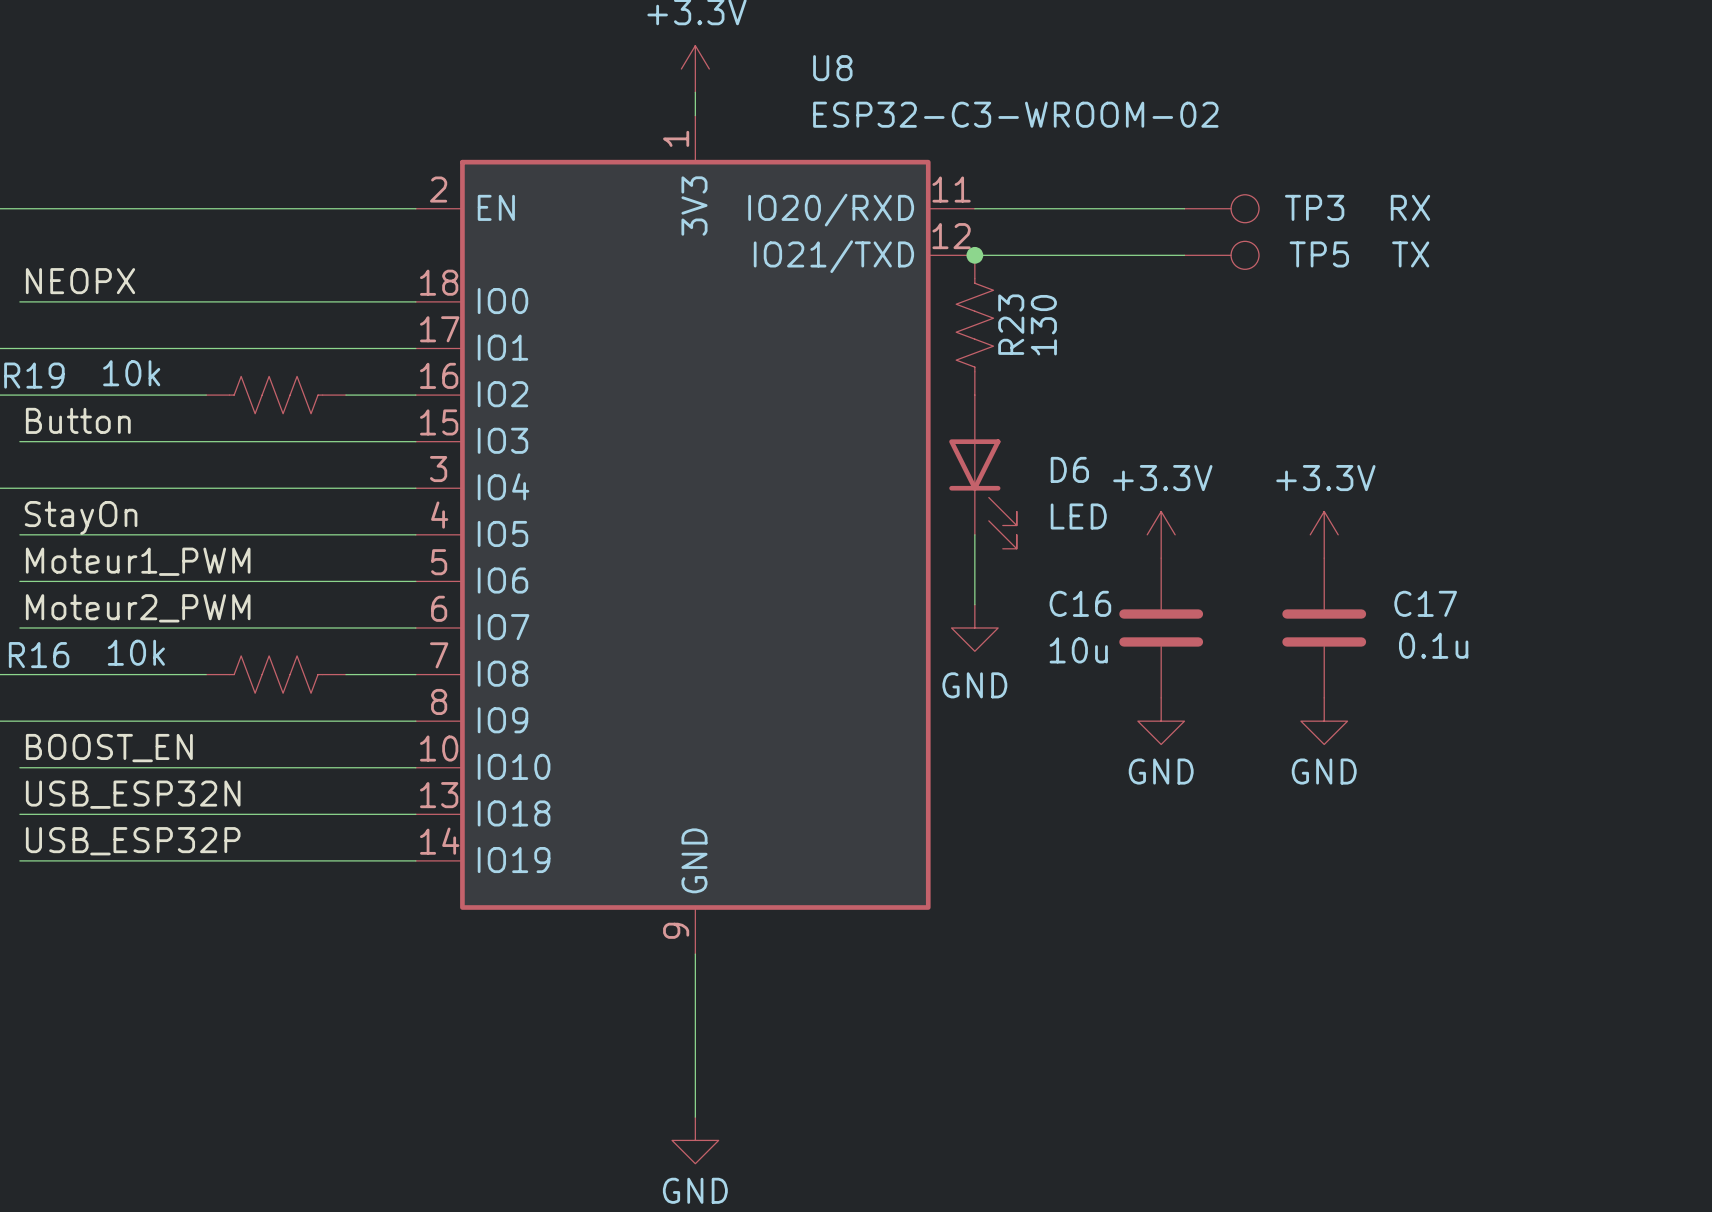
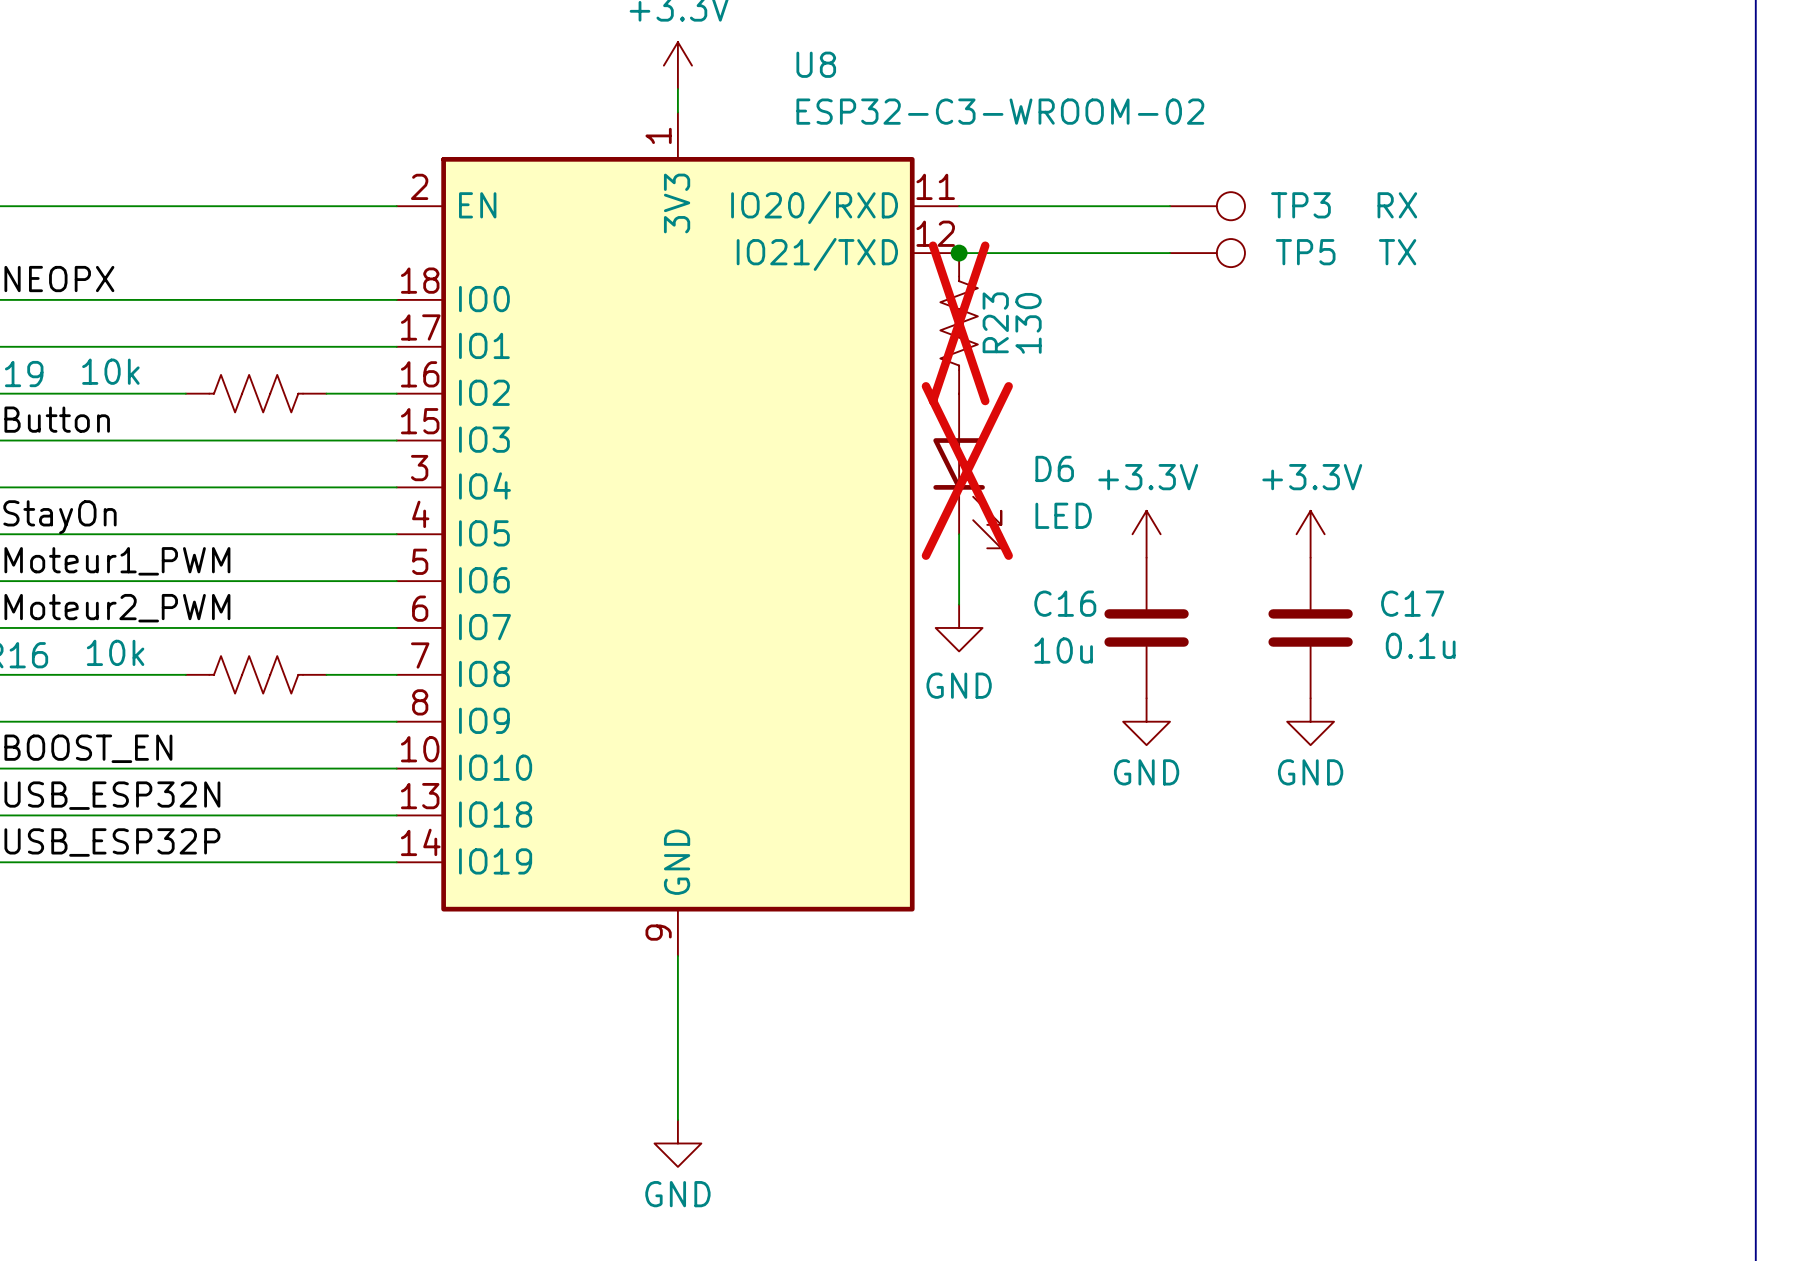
R23 do-not-place cross: none -> (959, 323)
D6 do-not-place cross: none -> (967, 470)

